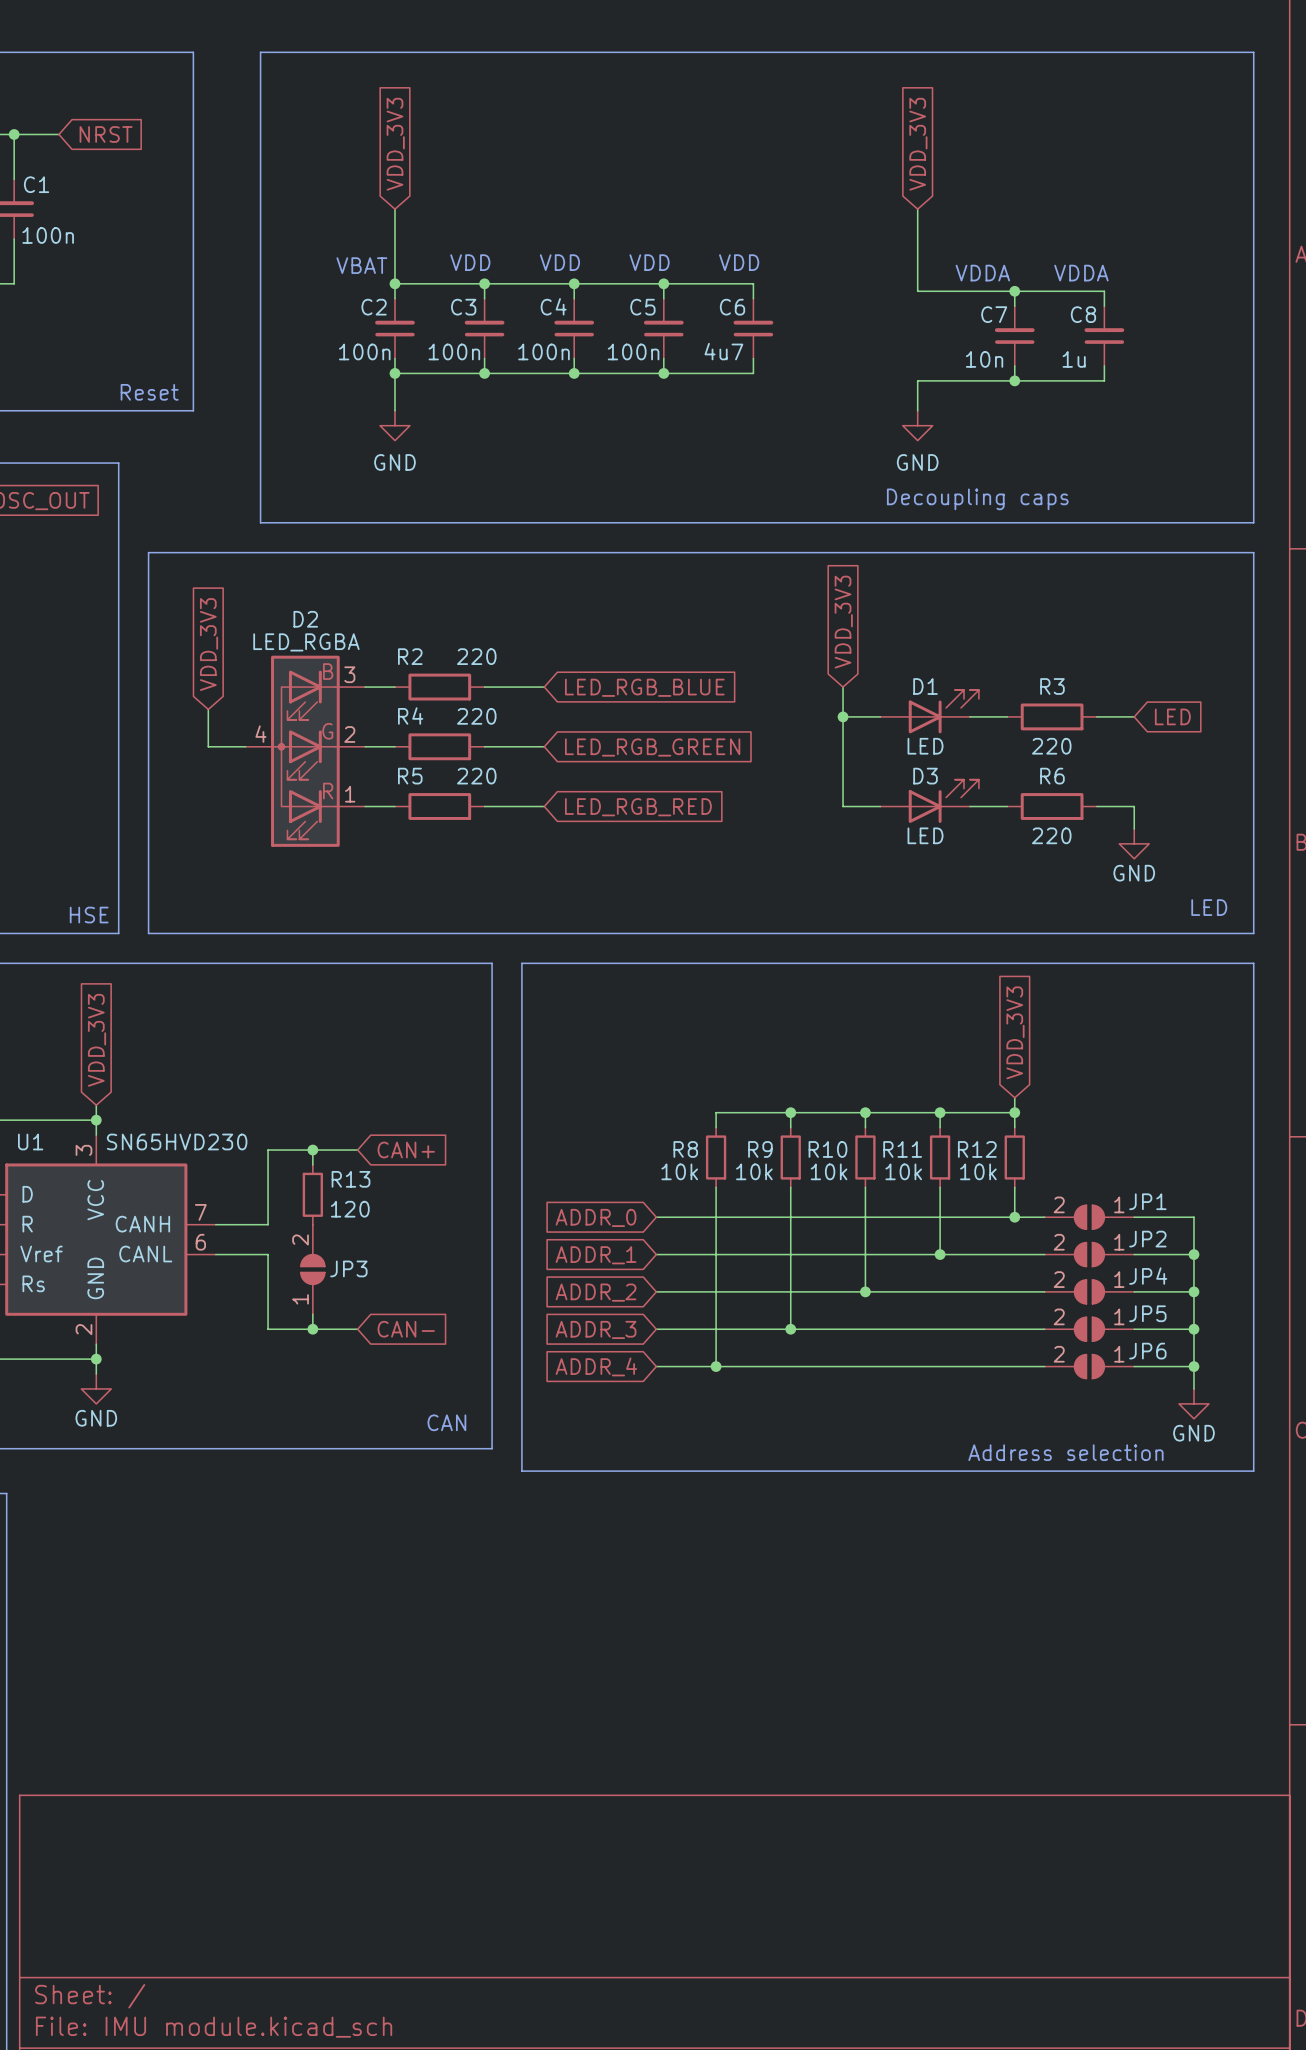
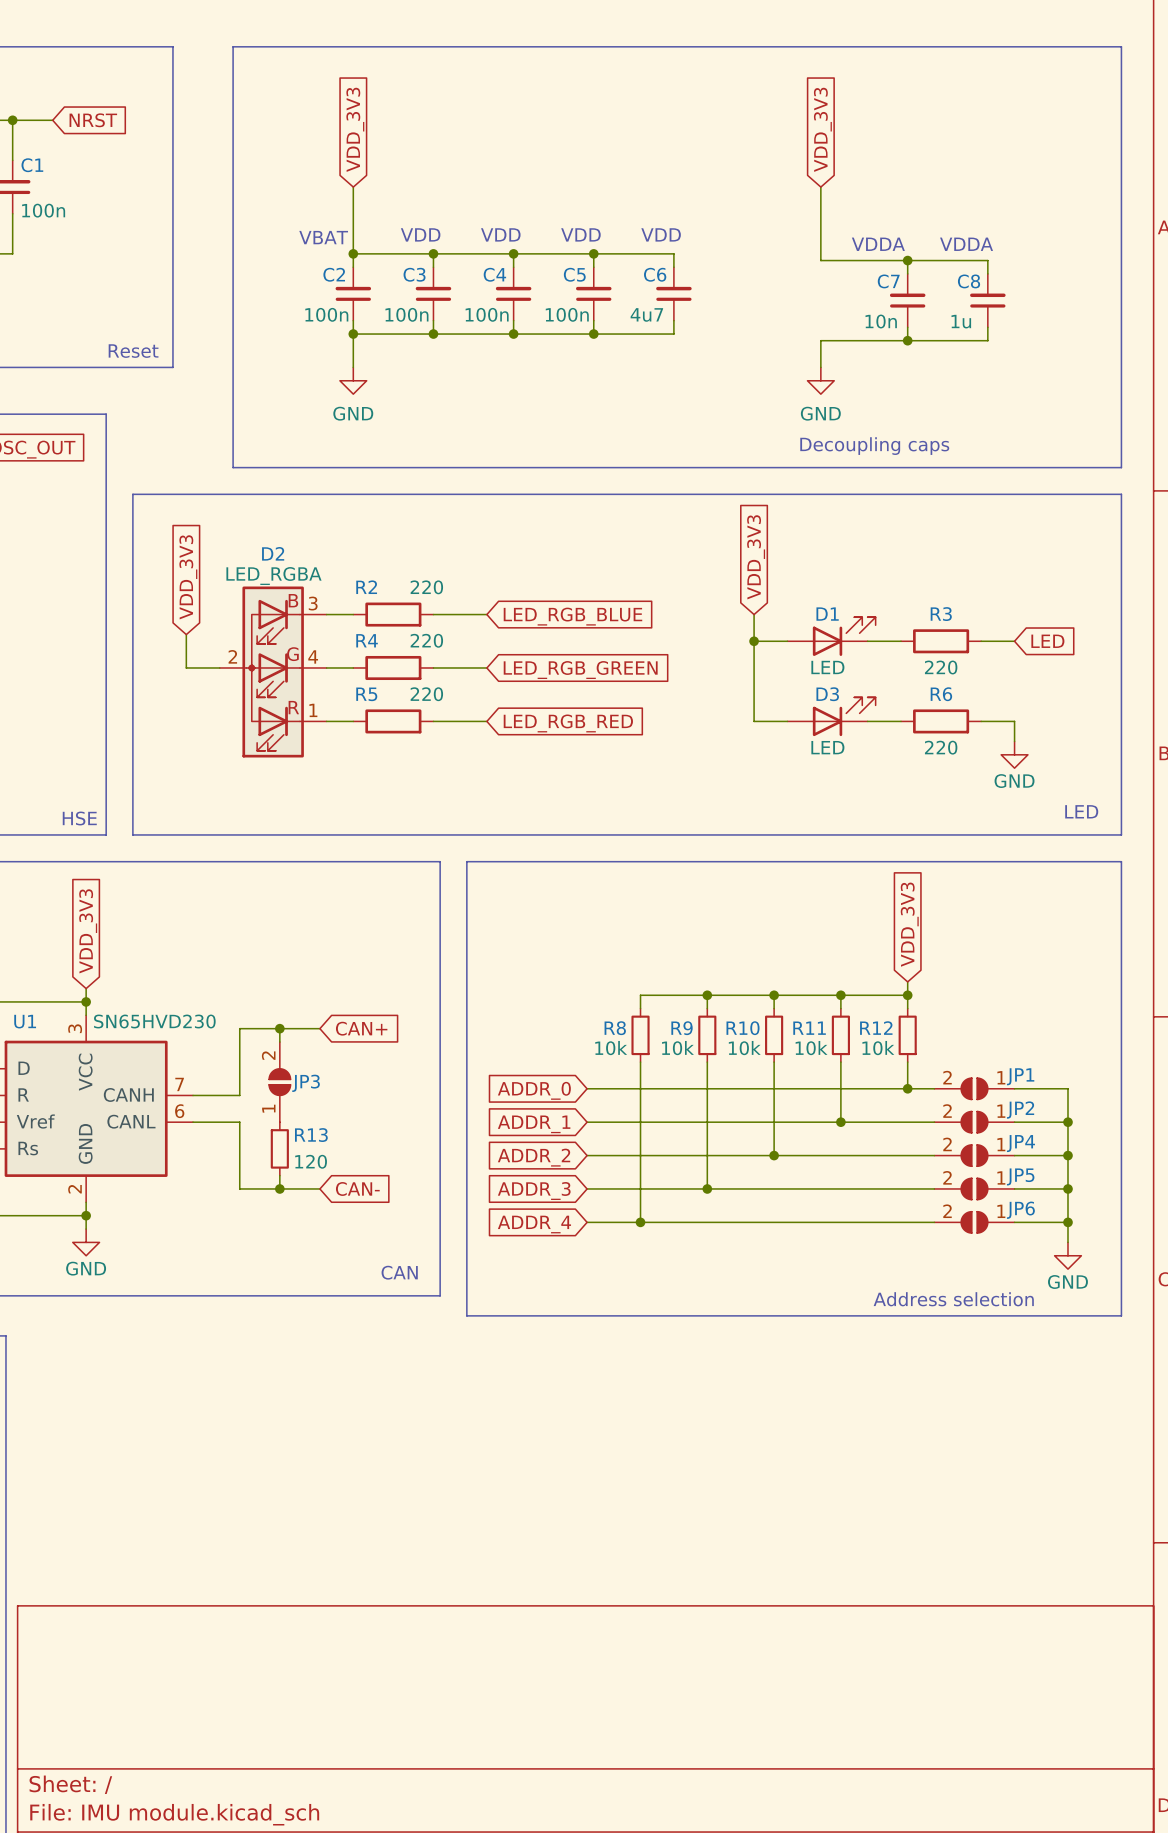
D2 pin number: 4 (260, 734) -> 2 (232, 656)
D2 pin number: 2 (349, 734) -> 4 (313, 656)
R13 position: (312, 1194) -> (279, 1148)
JP3 position: (312, 1269) -> (279, 1082)

